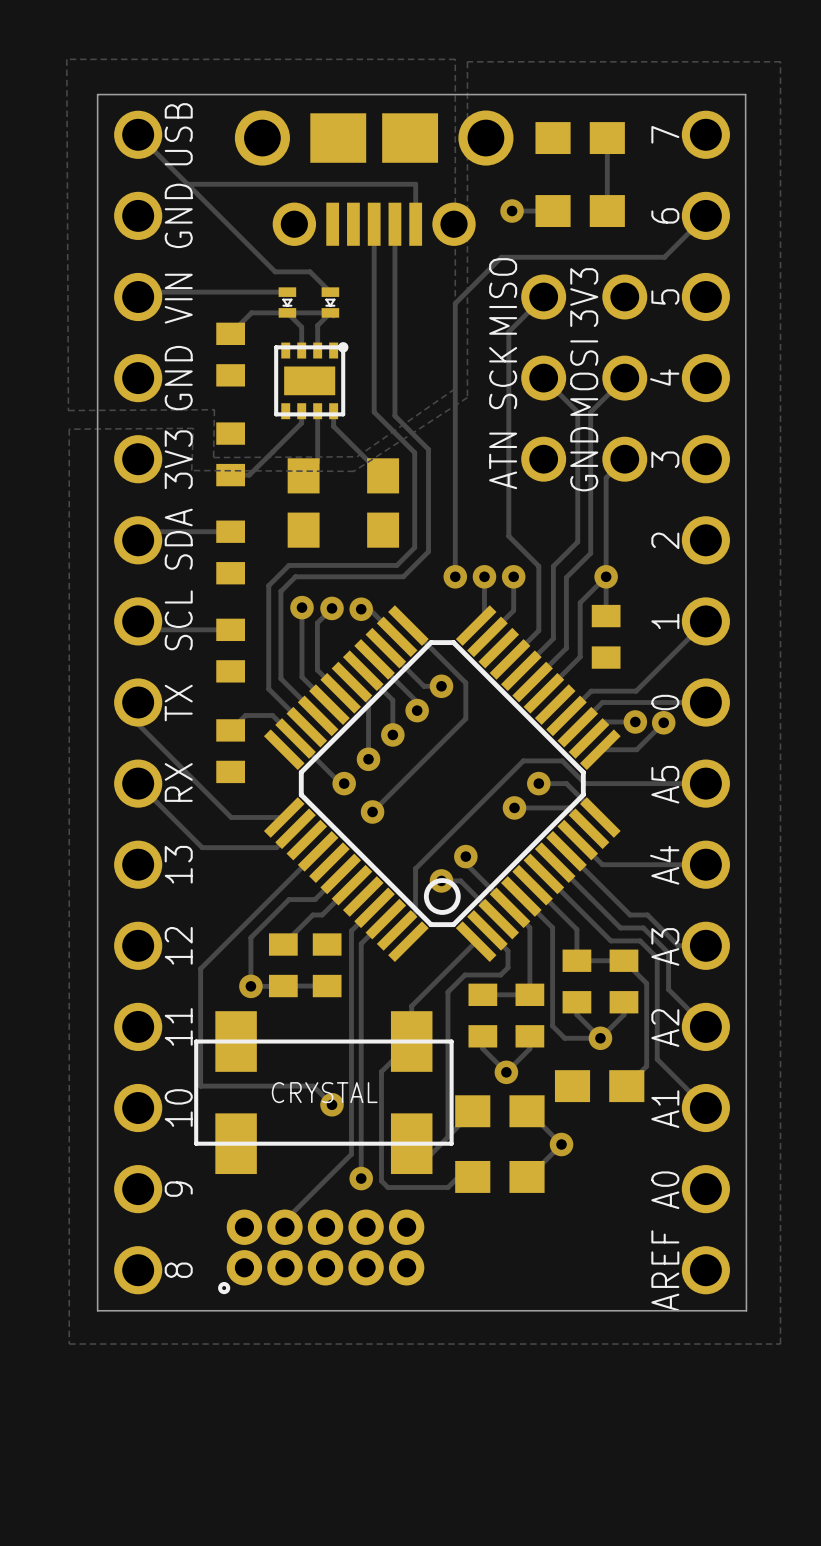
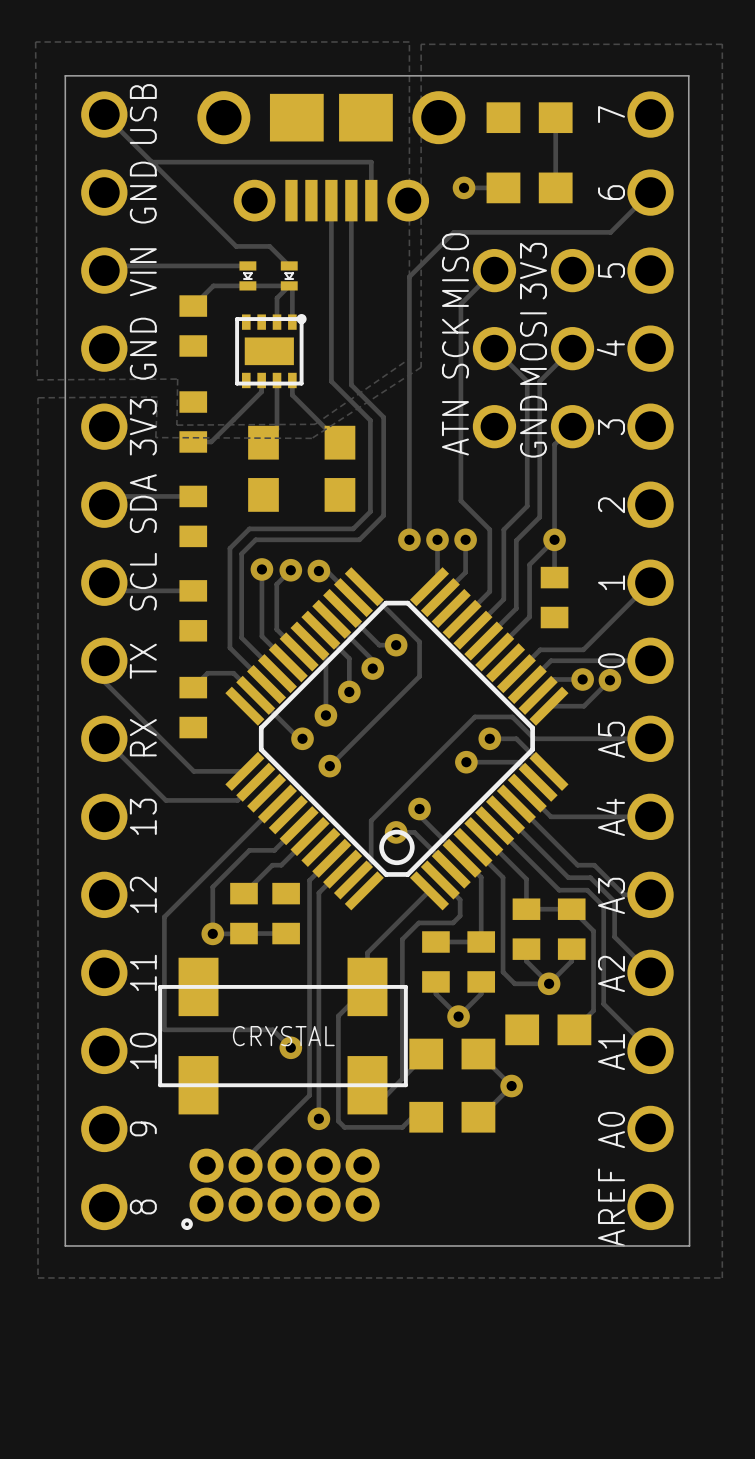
track: (287, 312) (301, 327) (301, 350) -> none
track: none -> (292, 289) (292, 322)

